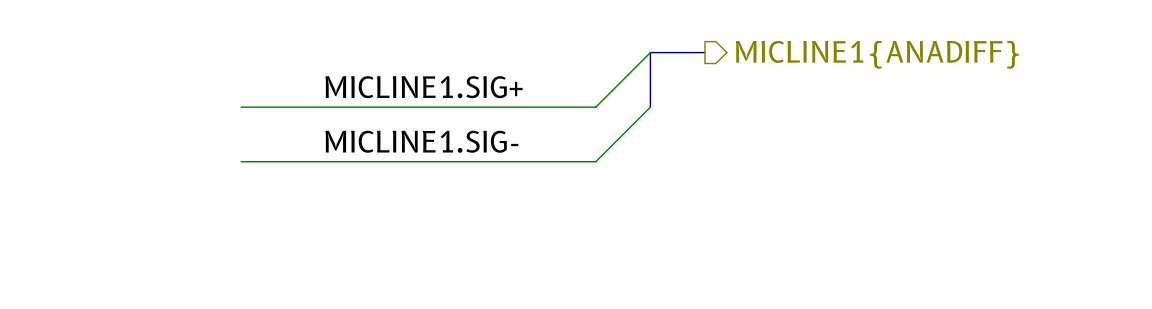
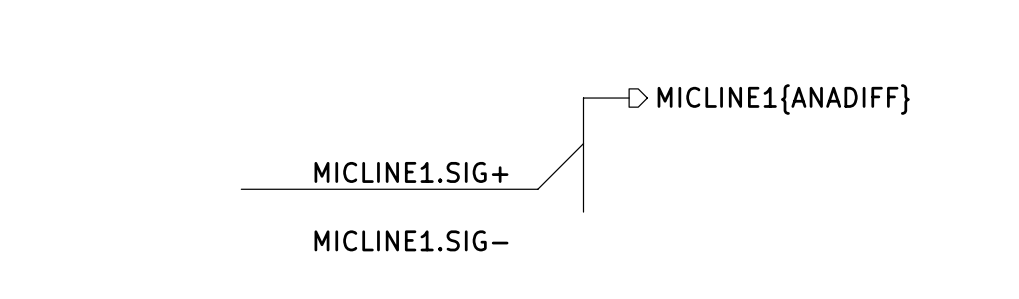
wire: (650, 52) (595, 107) (241, 107) -> none
label: MICLINE1.SIG+ (424, 87) -> none
bus: none -> (583, 143) (583, 212)
label: MICLINE1.SIG- (421, 141) -> MICLINE1.SIG+ (411, 172)
label: none -> MICLINE1.SIG- (411, 240)

